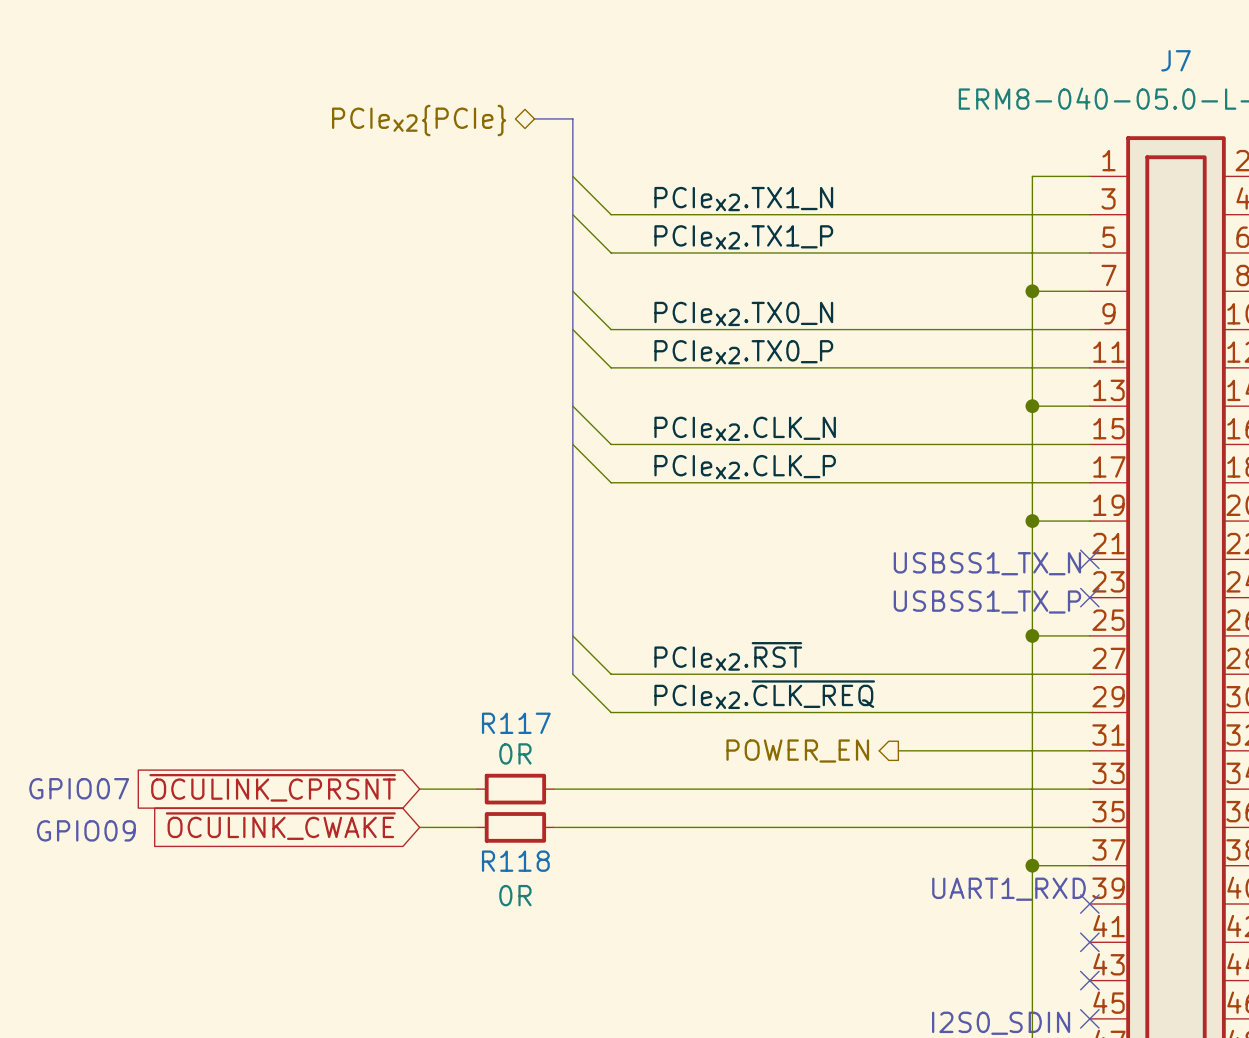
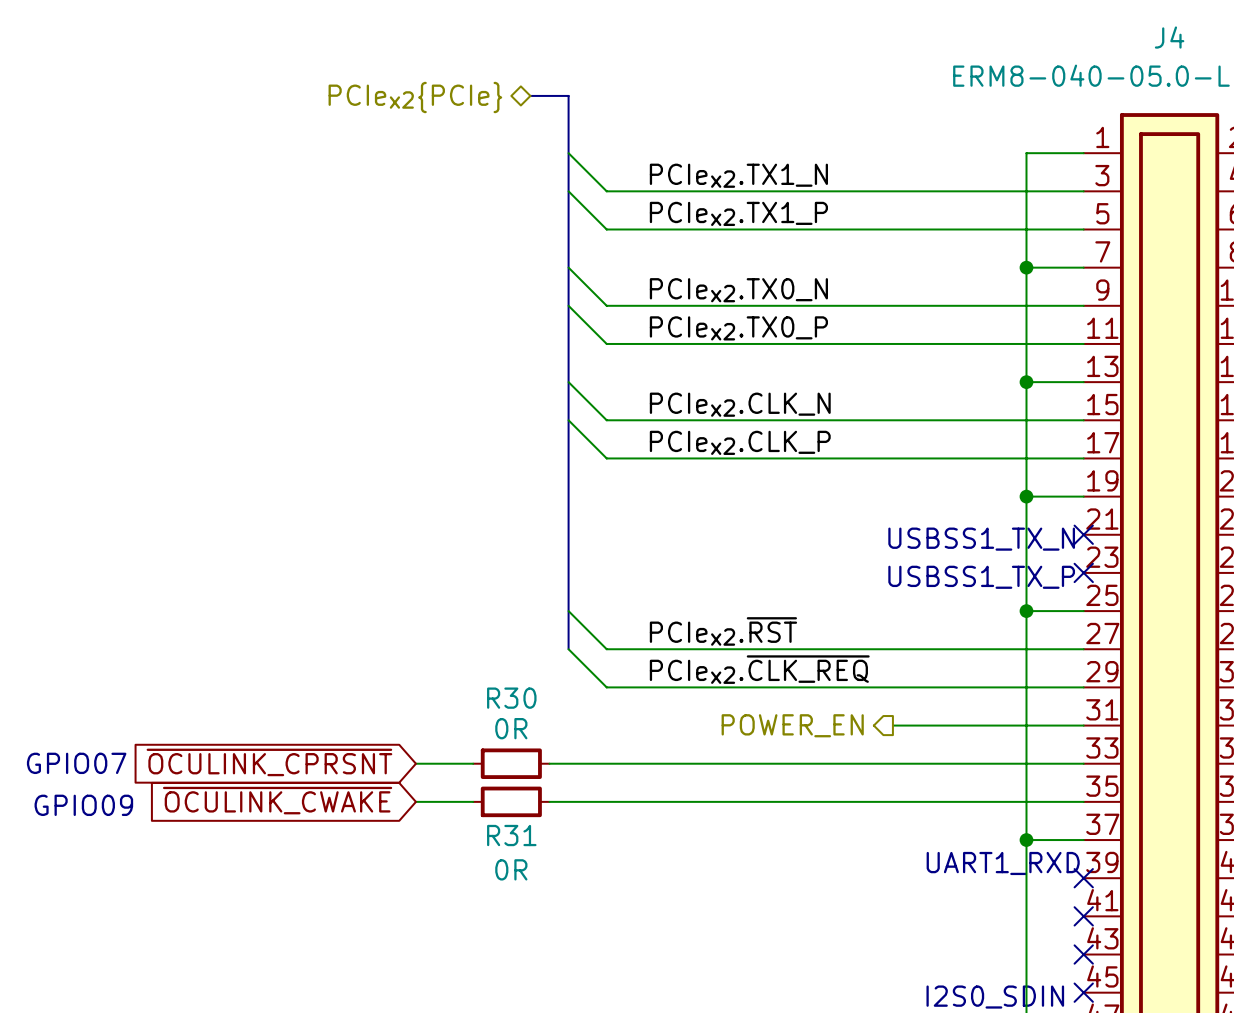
J7 name: J7 (1176, 60) -> J4 (1169, 37)
R117 name: R117 (516, 723) -> R30 (511, 698)
R118 name: R118 (515, 861) -> R31 (511, 835)

